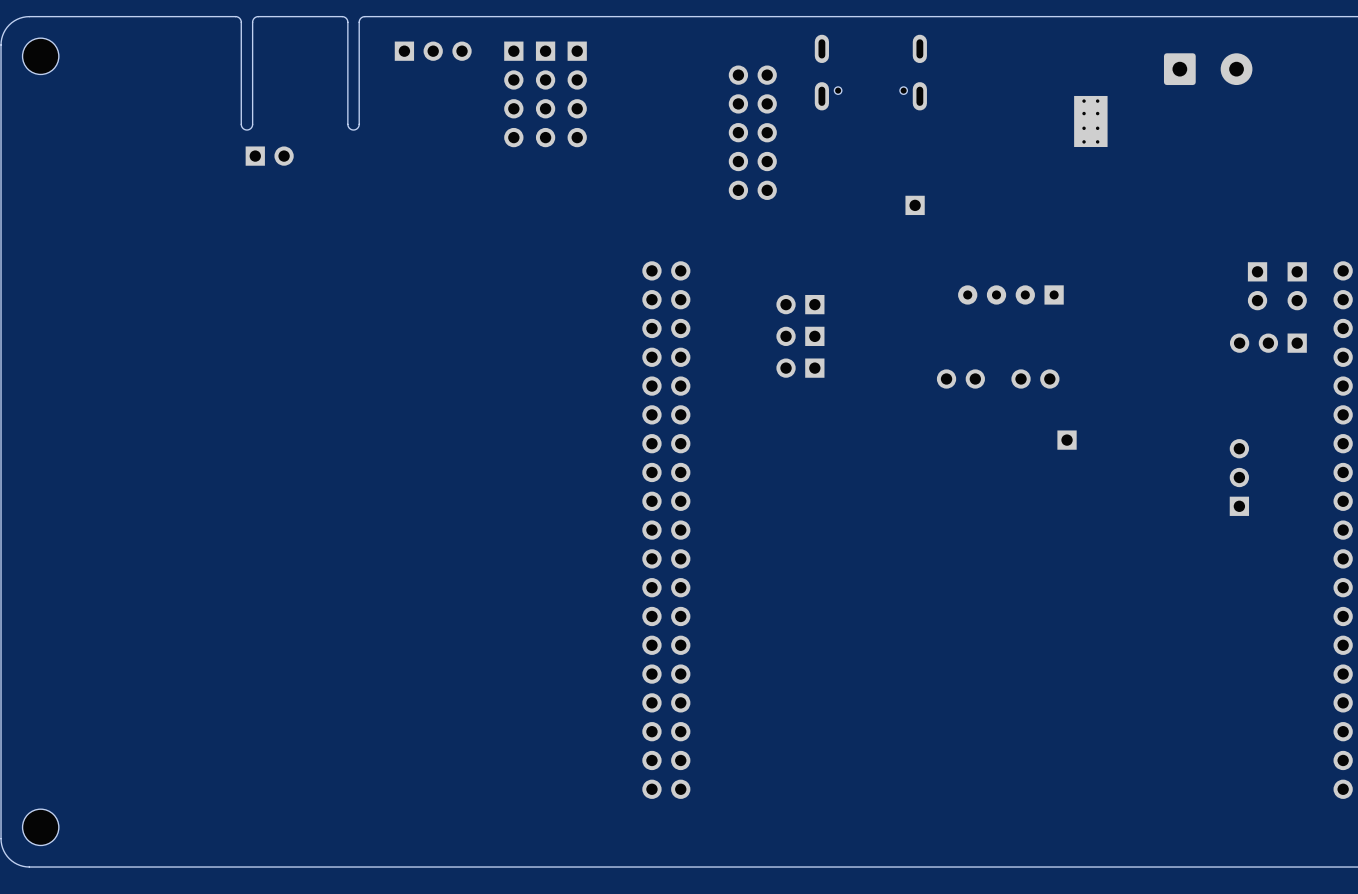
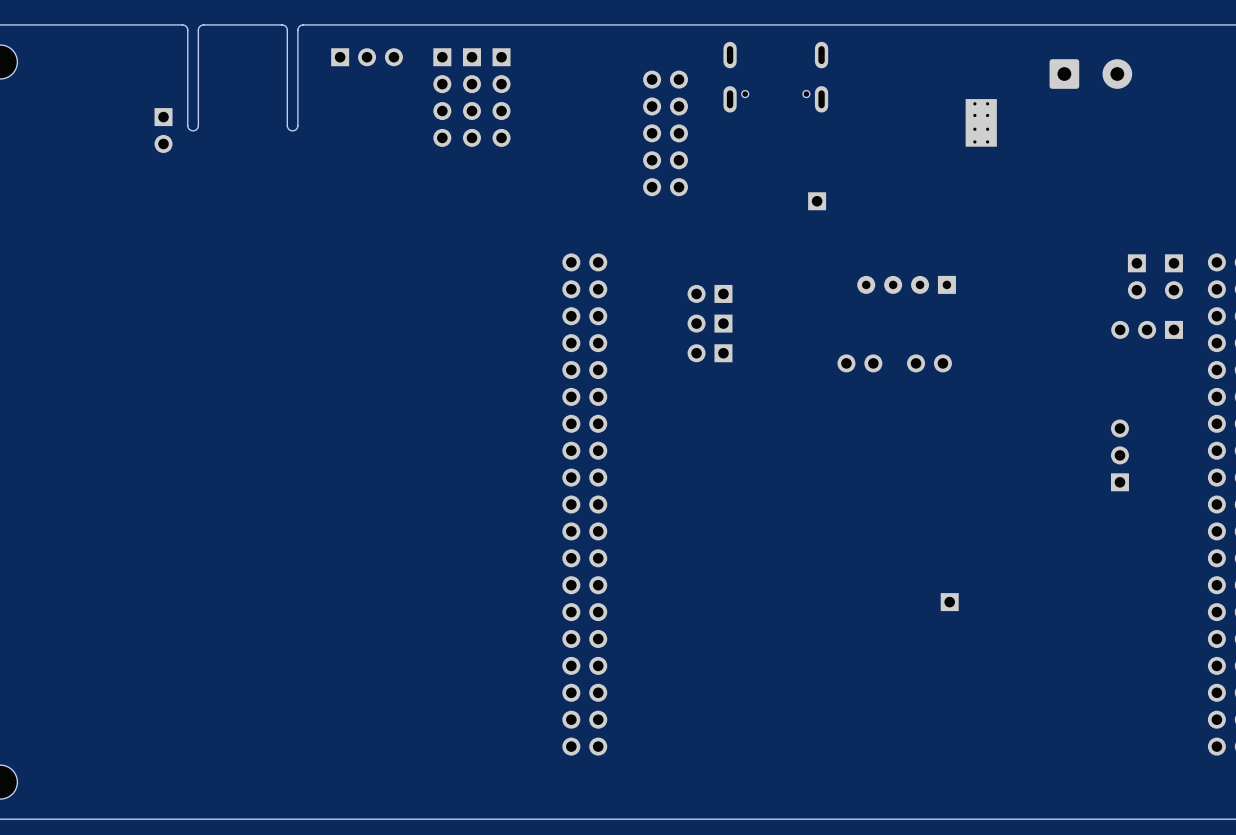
part rotation: 0° (269, 156) -> 90° clockwise (163, 130)
part position: (269, 156) -> (163, 130)
part position: (1067, 440) -> (949, 602)

